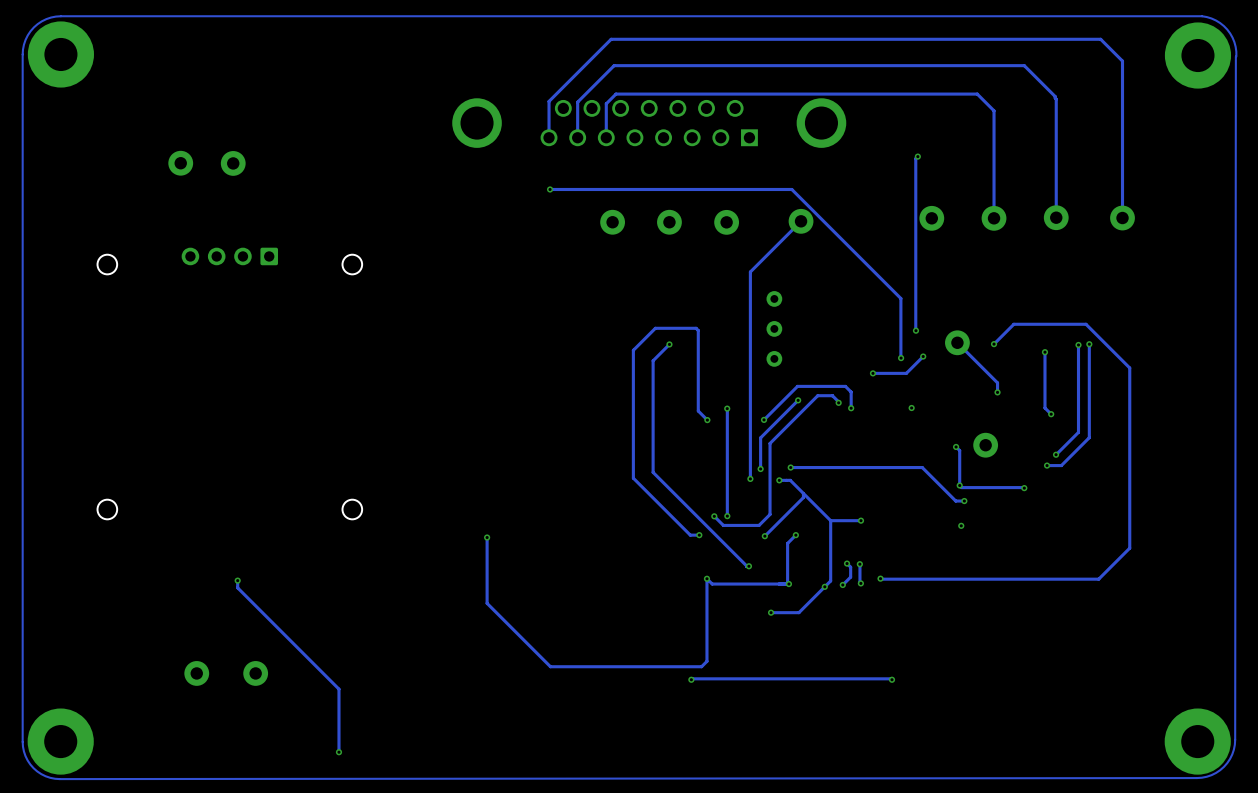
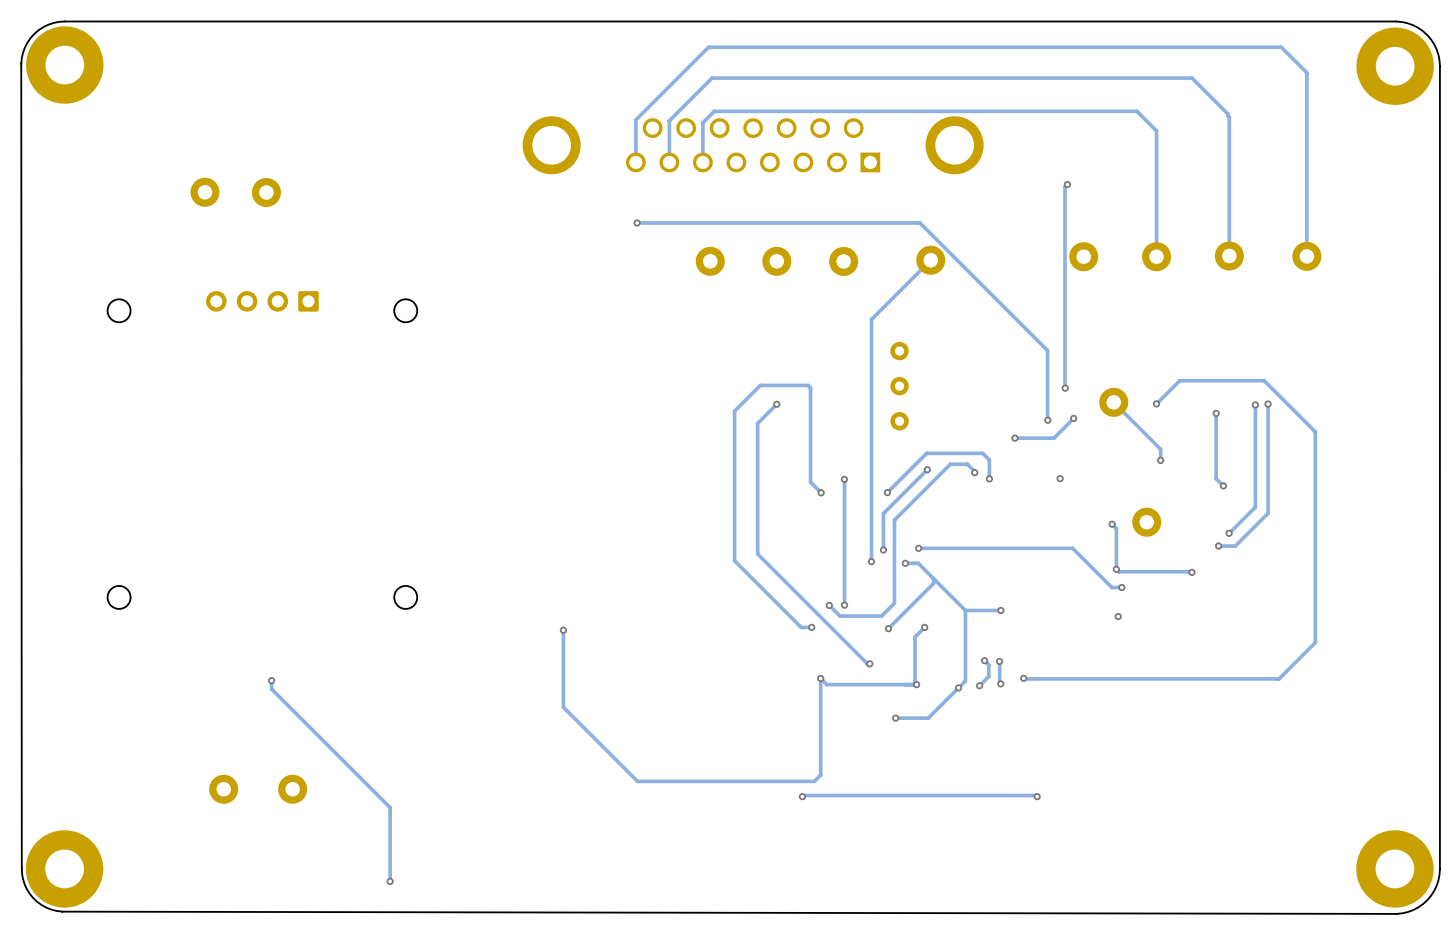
board edge: none -> (1396, 21) (64, 21) (43, 27) (27, 42) (21, 63) (21, 868) (24, 884) (29, 893) (46, 907) (62, 911) (1396, 913) (1418, 907) (1434, 891) (1439, 869) (1439, 66) (1436, 49) (1427, 35) (1413, 25) (1396, 21)
track: (1236, 56) (1234, 42) (1227, 29) (1215, 20) (1202, 16) (60, 16) (41, 21) (27, 35) (22, 54) (22, 741) (27, 760) (41, 774) (59, 779) (1196, 778) (1216, 772) (1230, 758) (1235, 739) (1235, 56) -> none

